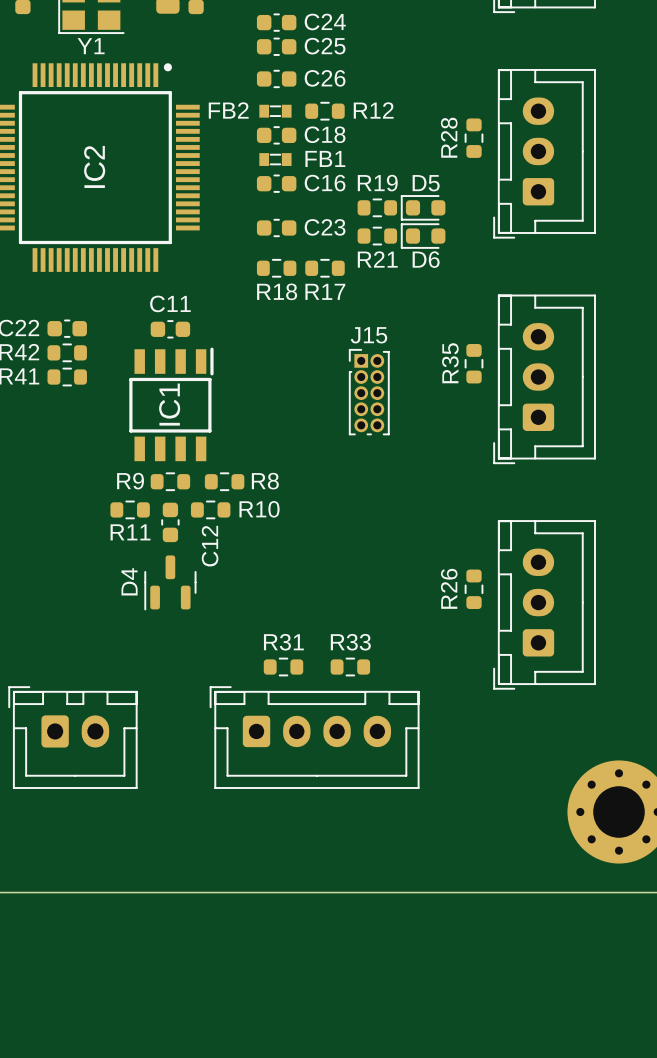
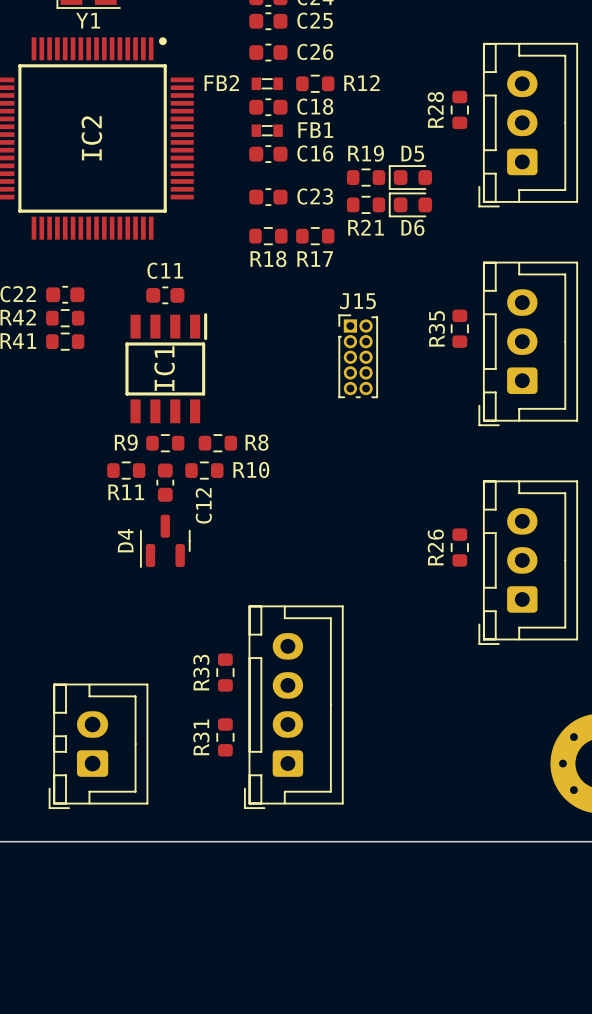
R31 name position: R31 (283, 642) -> R31 (201, 737)
R33 name position: R33 (350, 642) -> R33 (201, 672)
R31 rotation: 0° (283, 667) -> 90° clockwise (225, 737)
R31 position: (283, 667) -> (225, 737)
R33 rotation: 0° (350, 667) -> 90° clockwise (225, 672)
R33 position: (350, 667) -> (225, 672)
part rotation: 0° (72, 737) -> 90° counterclockwise (98, 746)
part rotation: 0° (314, 737) -> 90° counterclockwise (293, 707)

